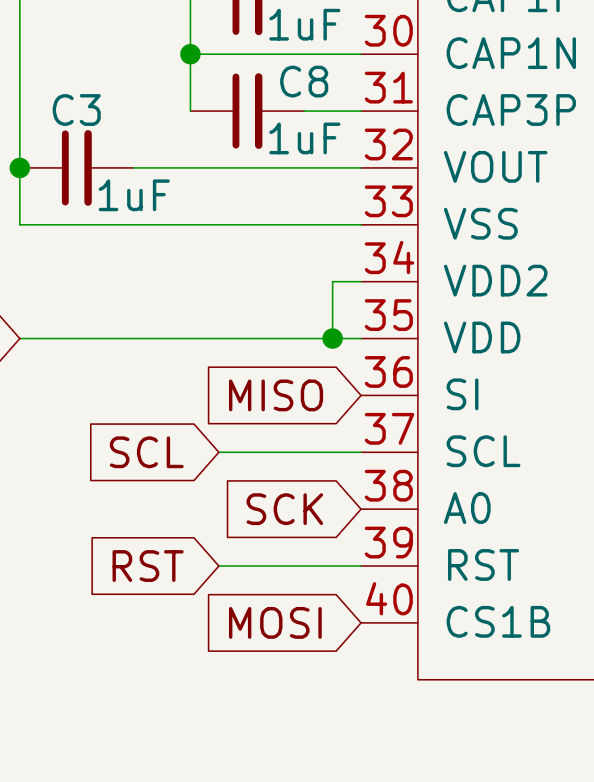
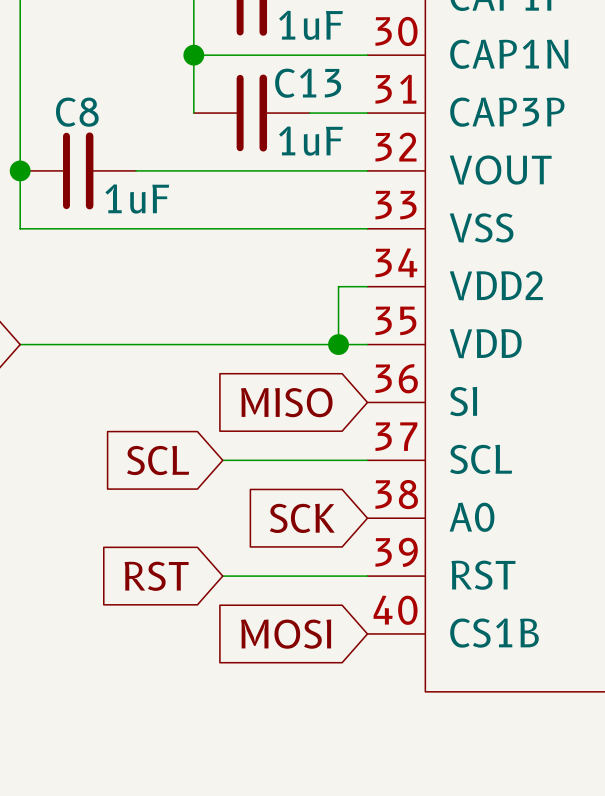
C8 name: C8 (304, 81) -> C13 (308, 83)
C3 name: C3 (76, 110) -> C8 (77, 112)

